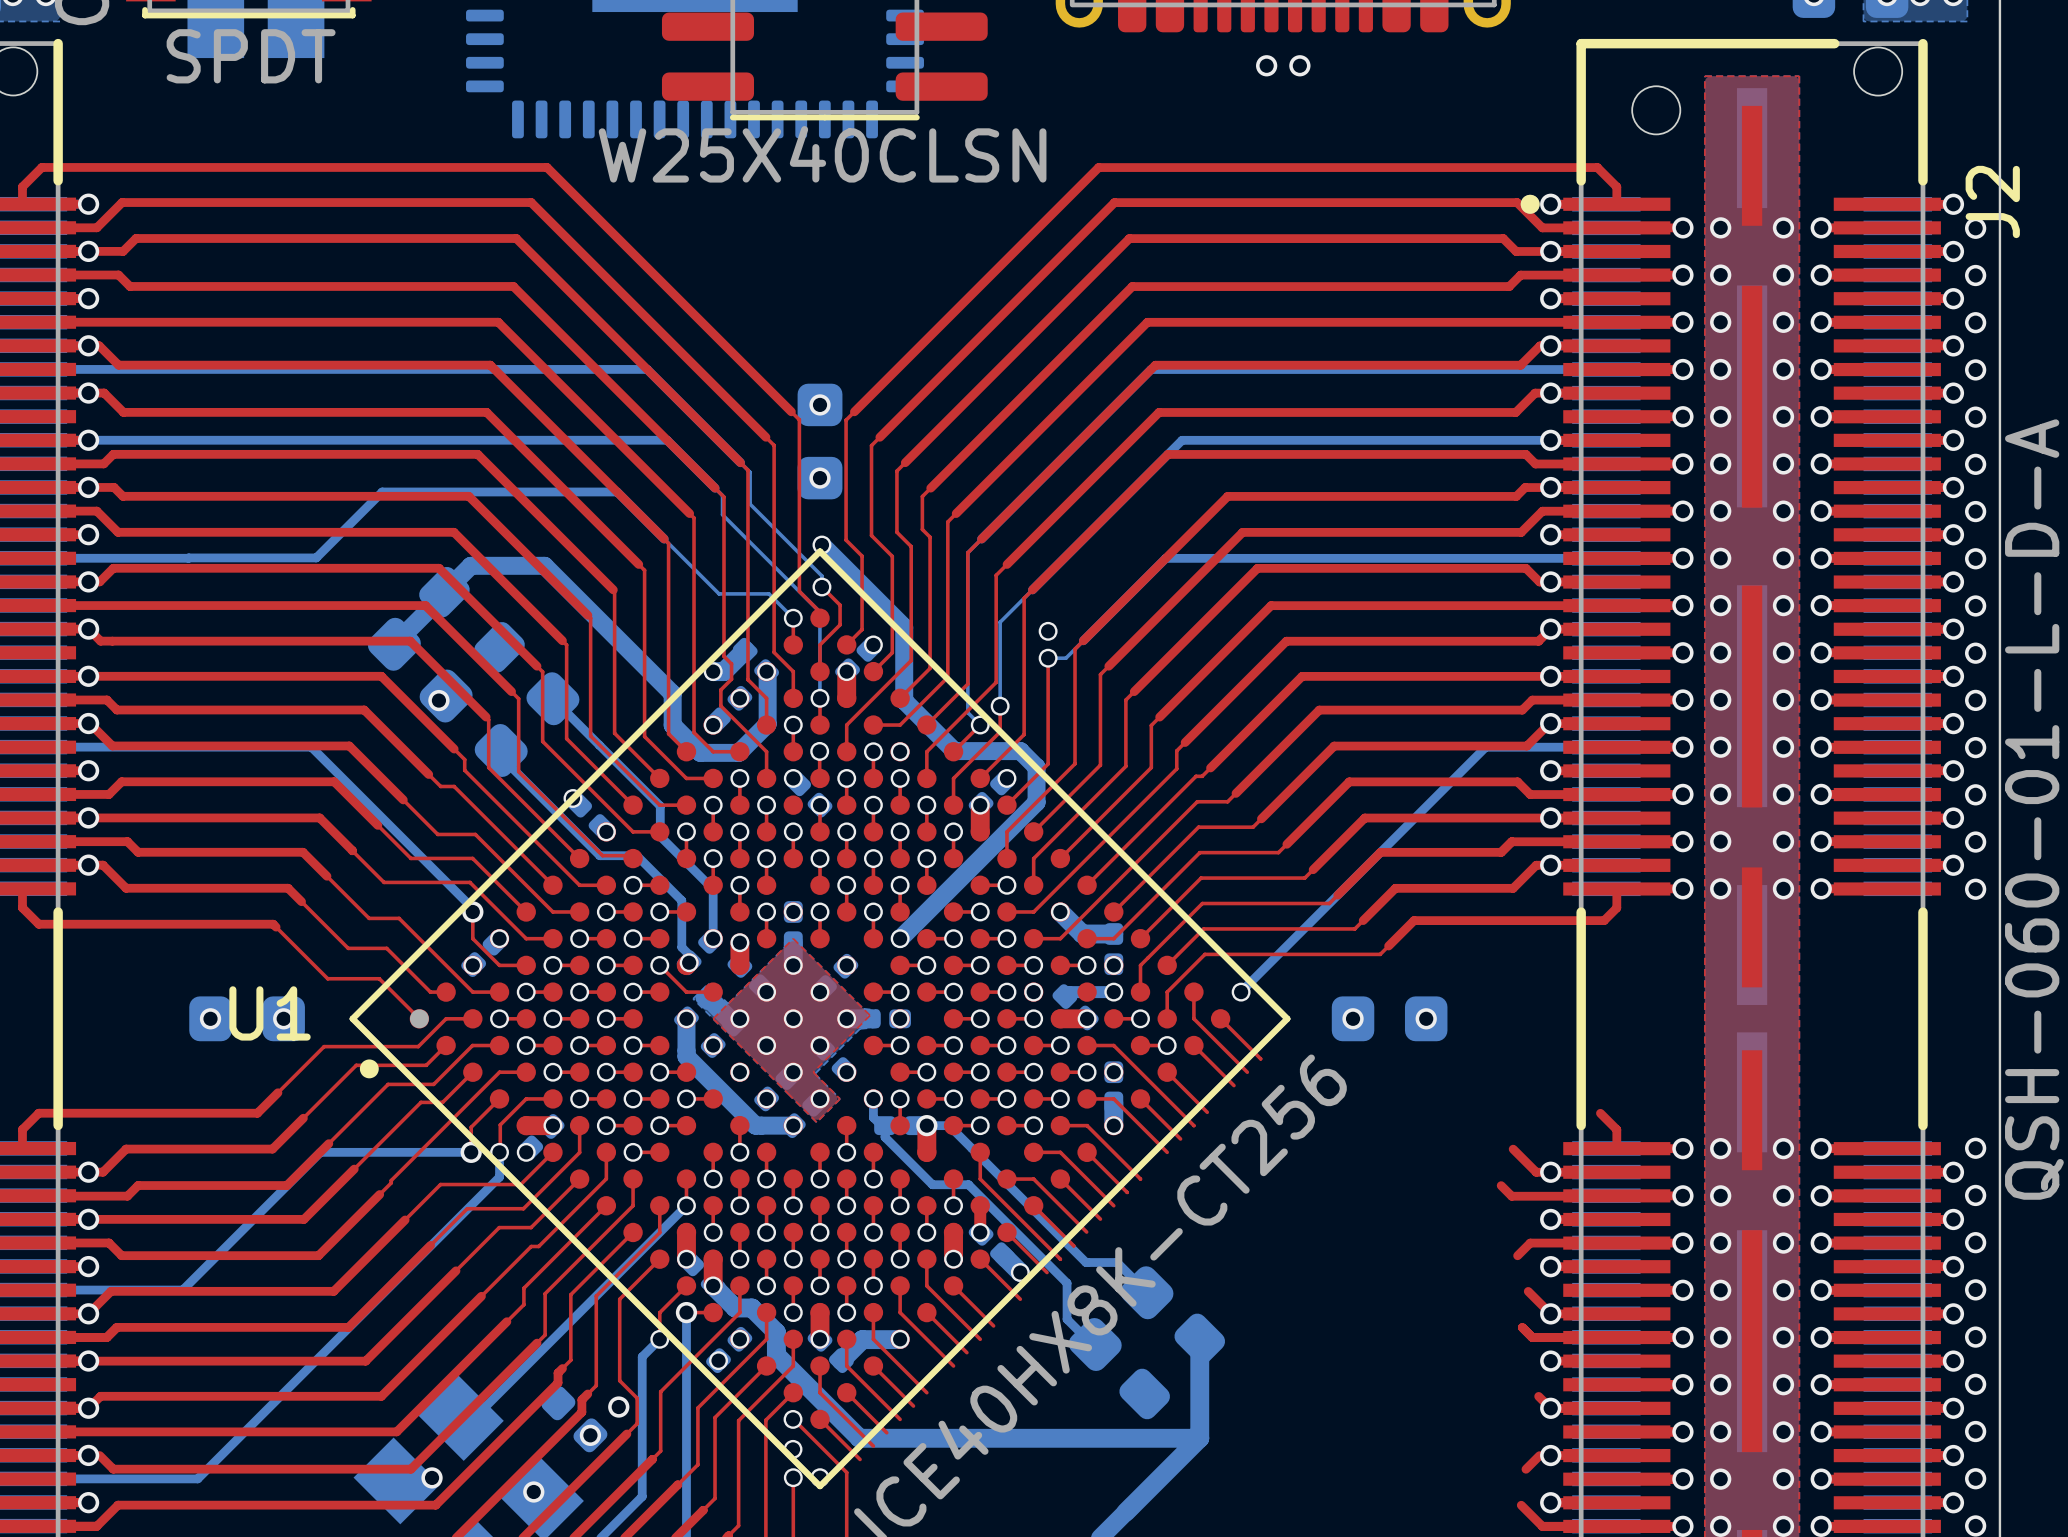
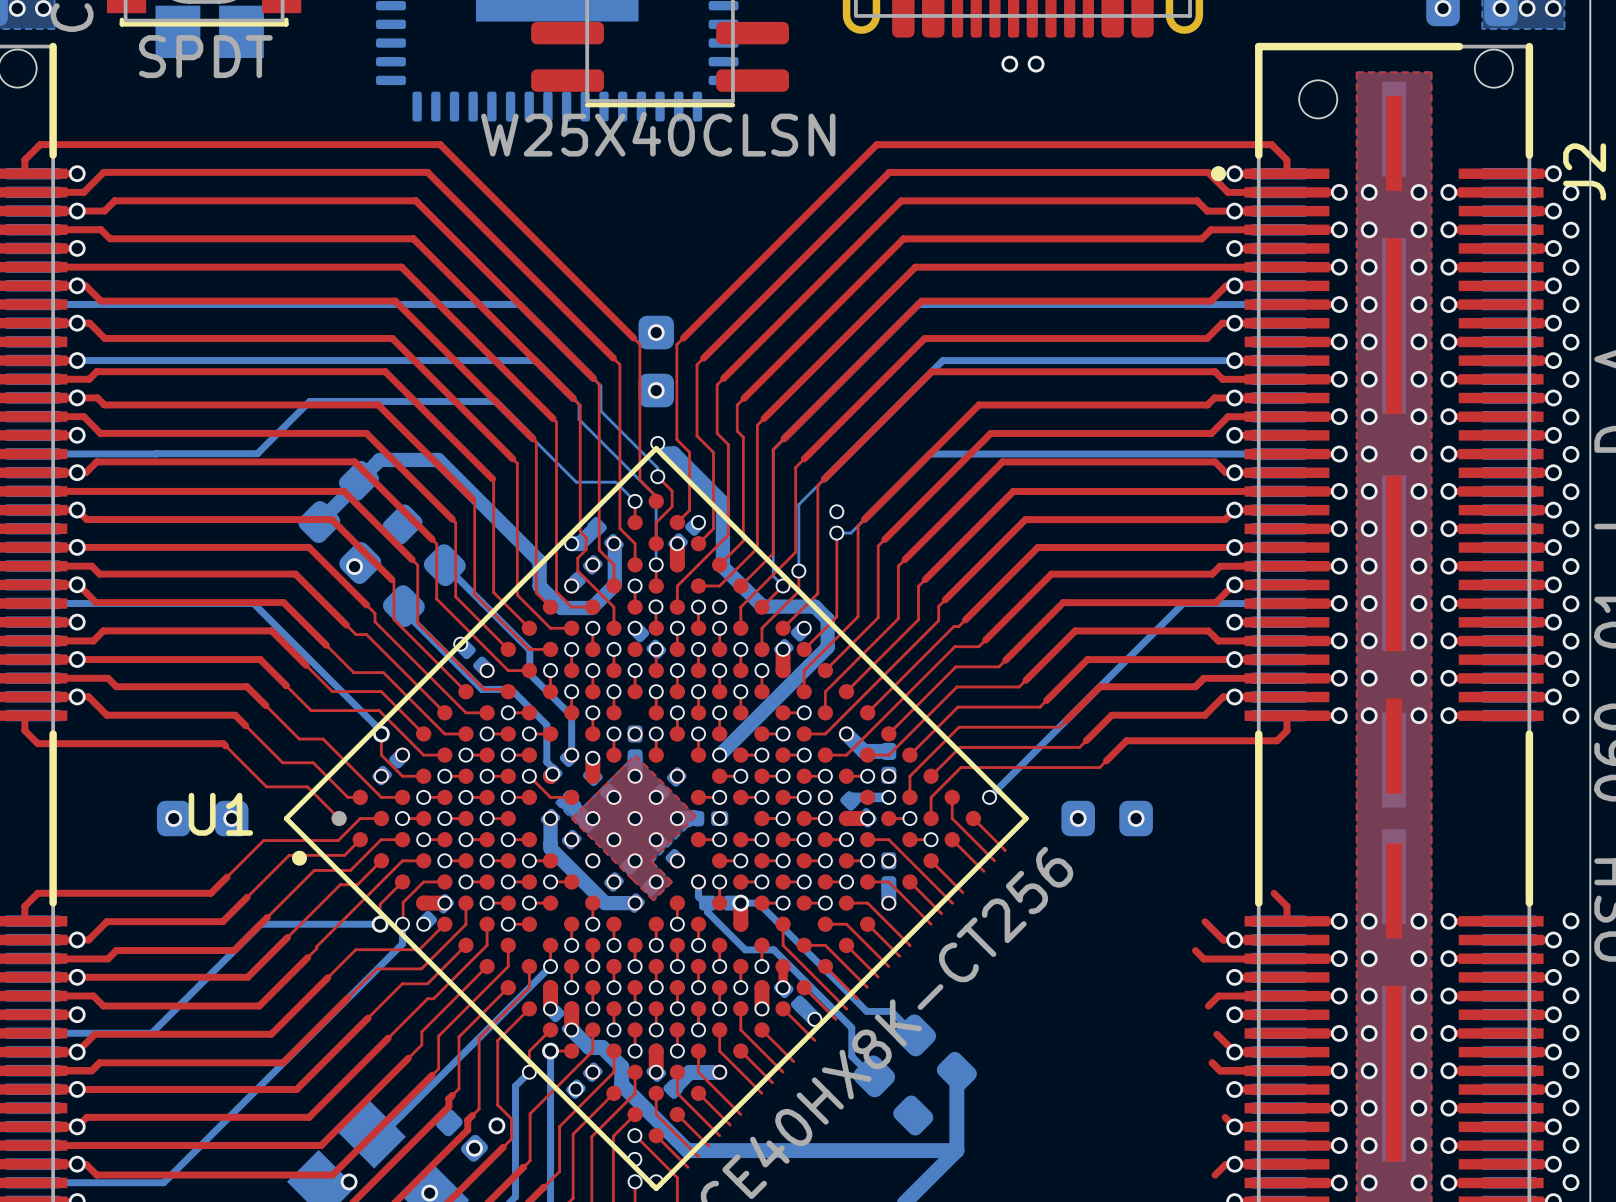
bottom track: (821, 545) (904, 627) -> (667, 453) (673, 453) (722, 502) (722, 508)

